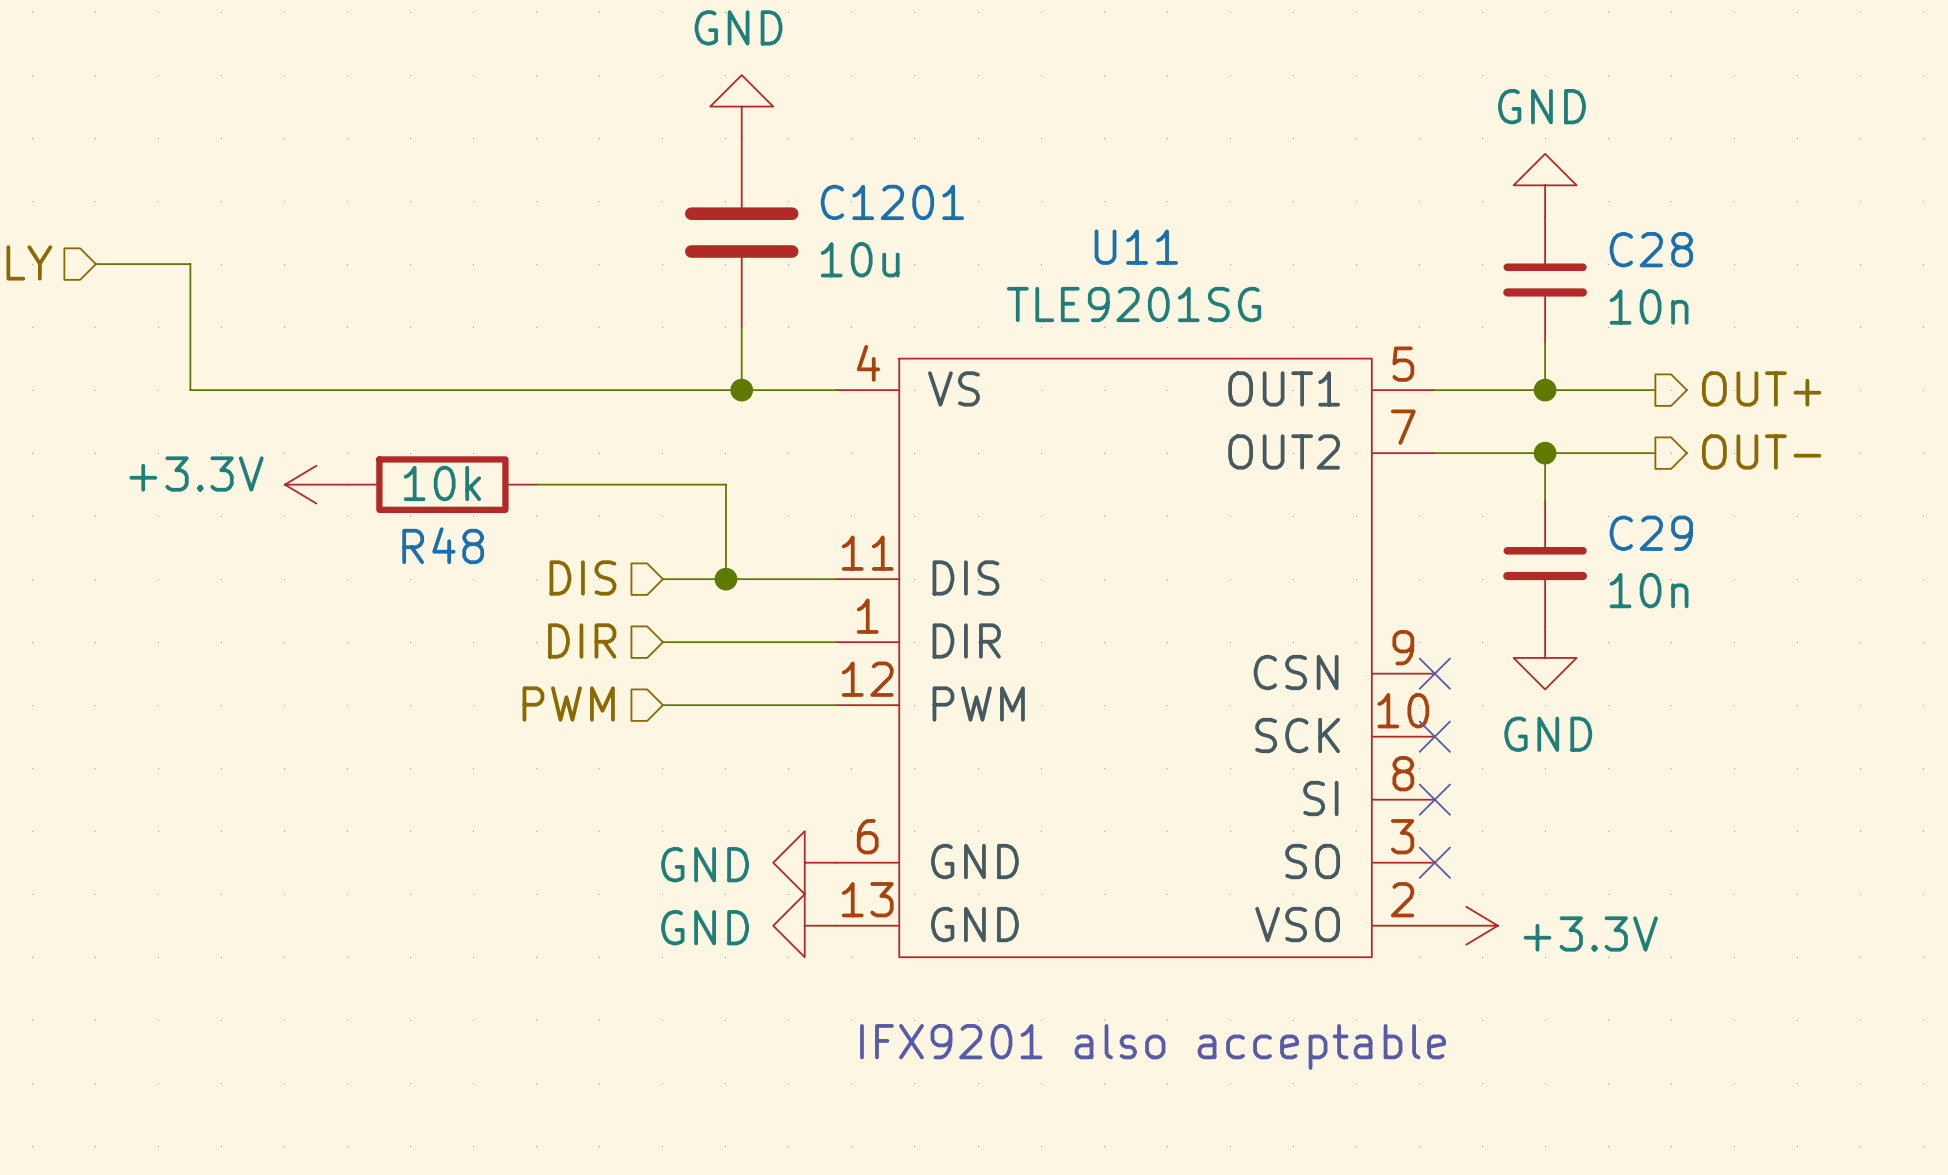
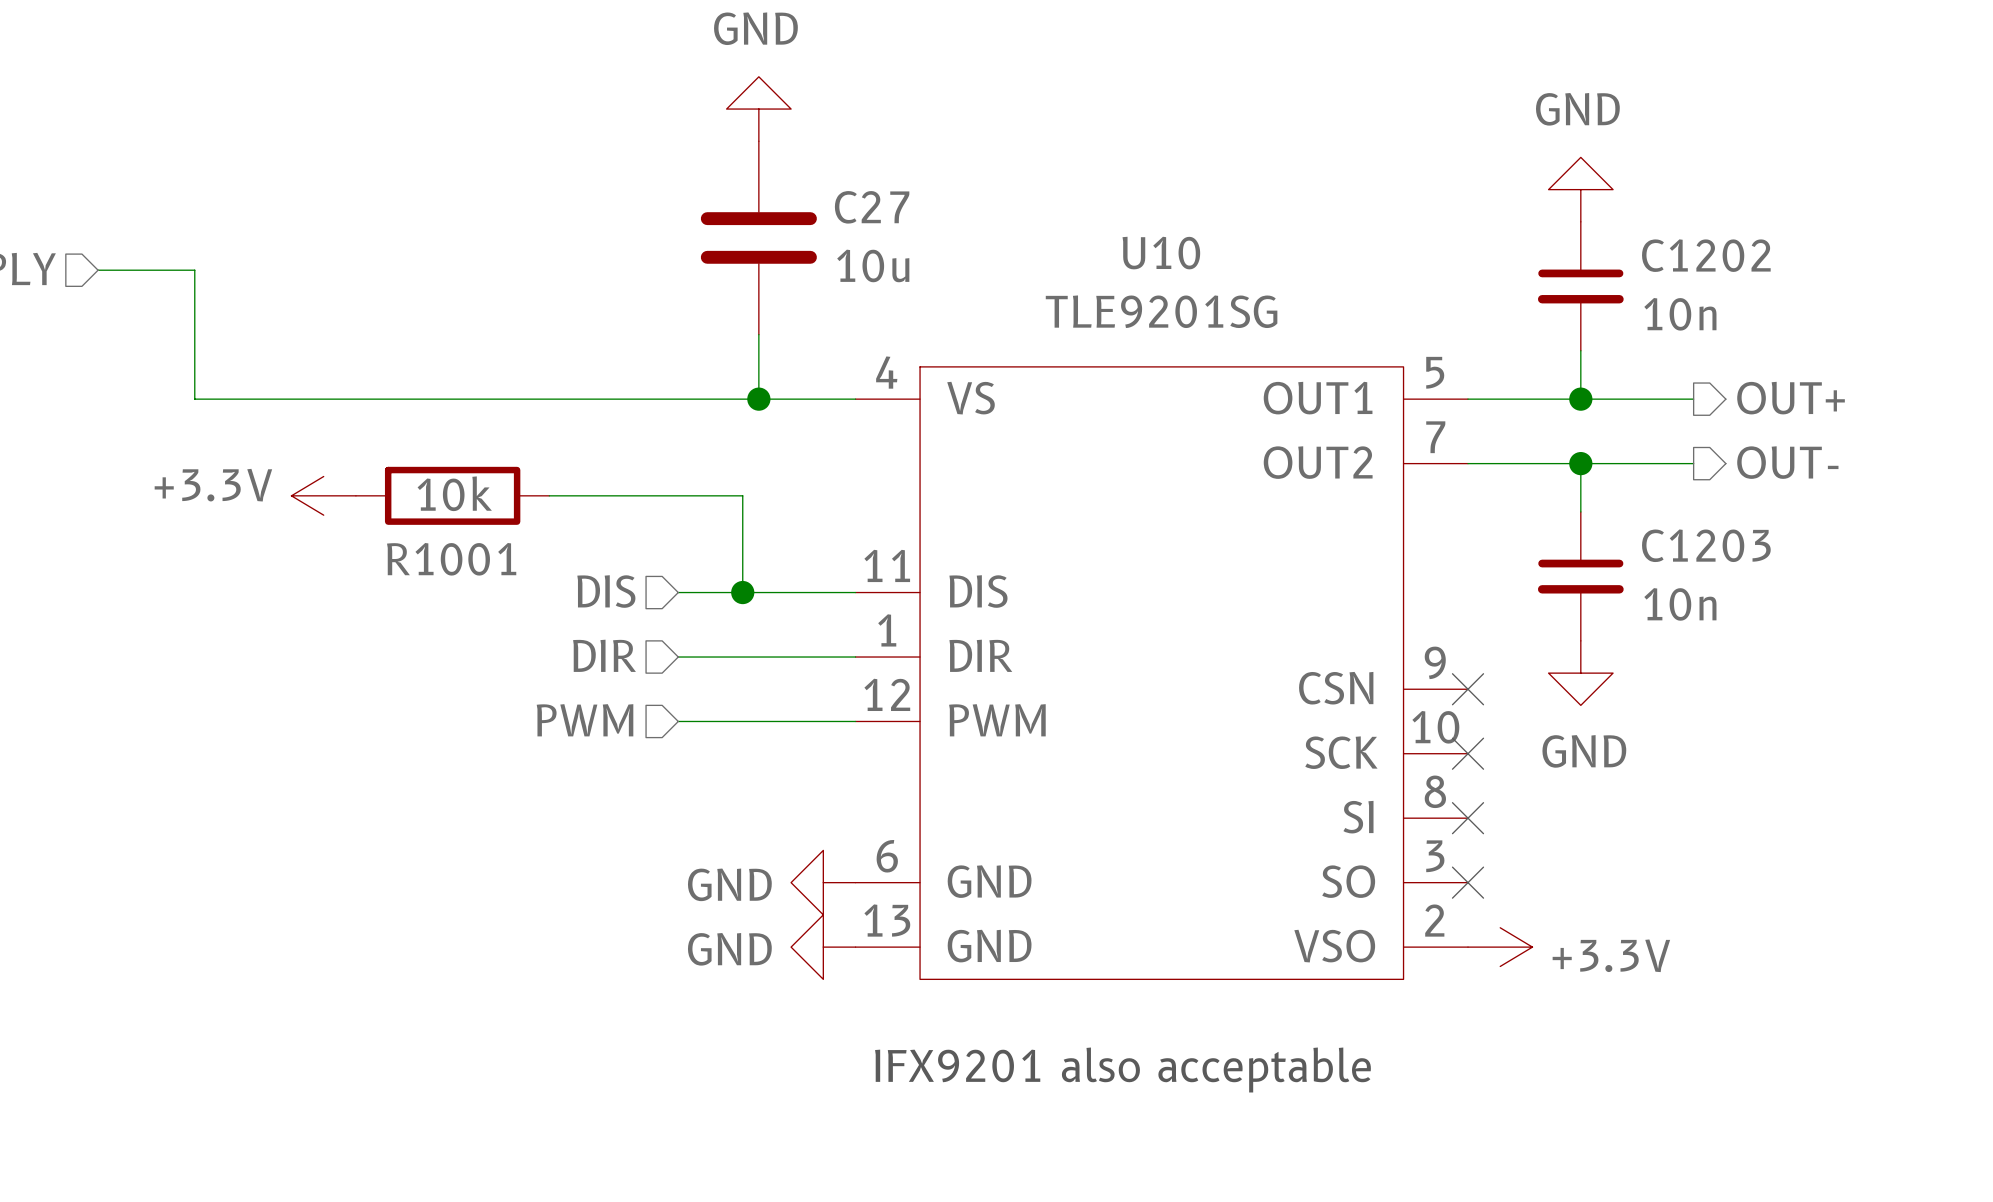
C1201 name: C1201 (892, 202) -> C27 (872, 207)
U11 name: U11 (1136, 247) -> U10 (1161, 253)
C28 name: C28 (1651, 249) -> C1202 (1706, 255)
C29 name: C29 (1651, 533) -> C1203 (1706, 545)
R48 name: R48 (443, 545) -> R1001 (451, 559)

